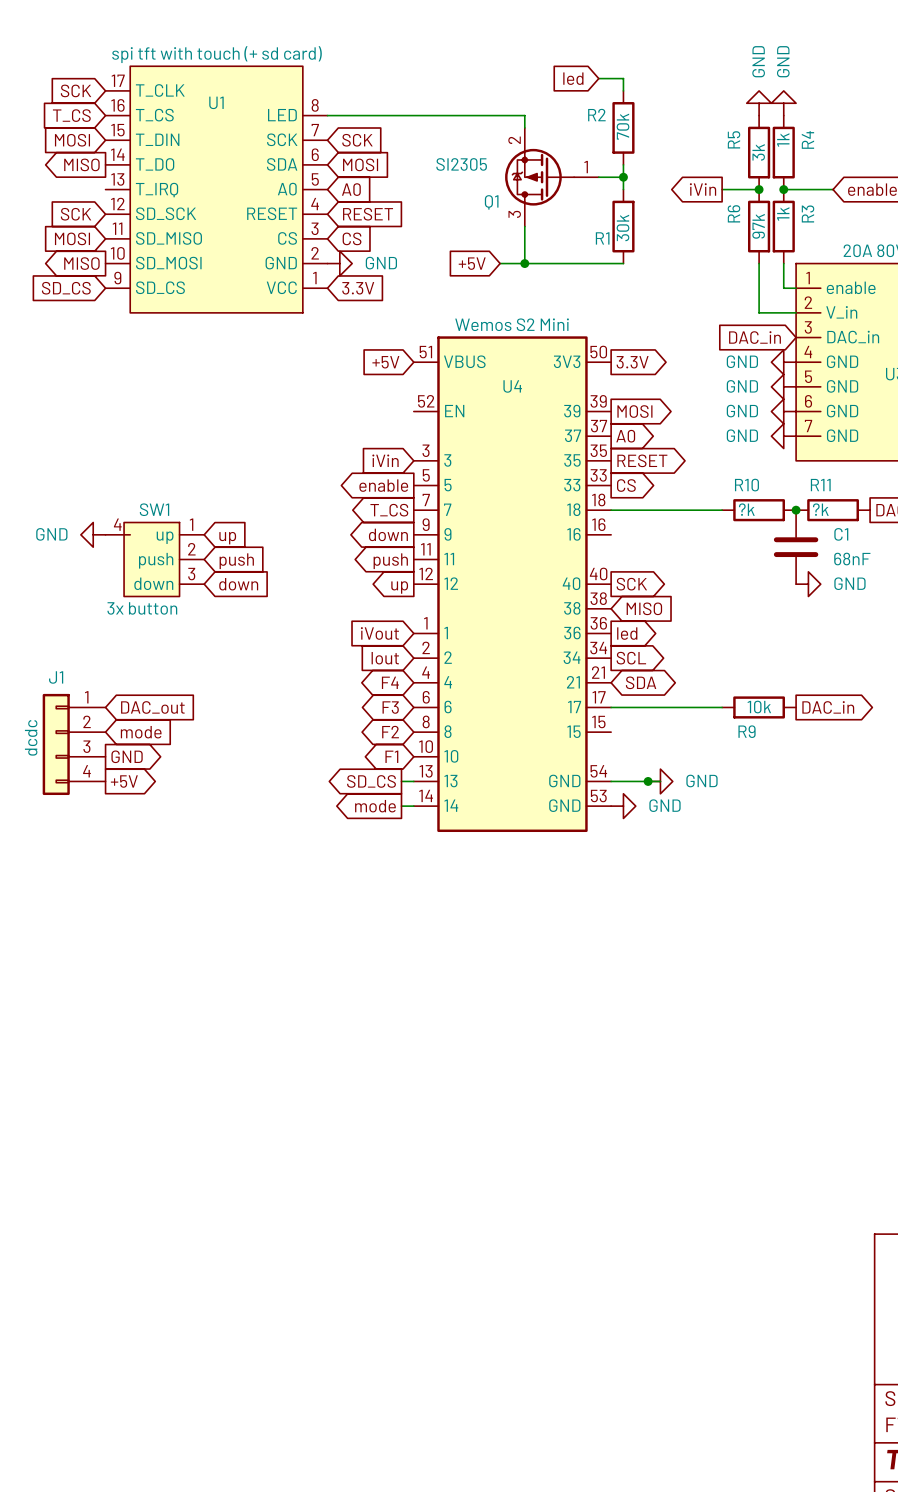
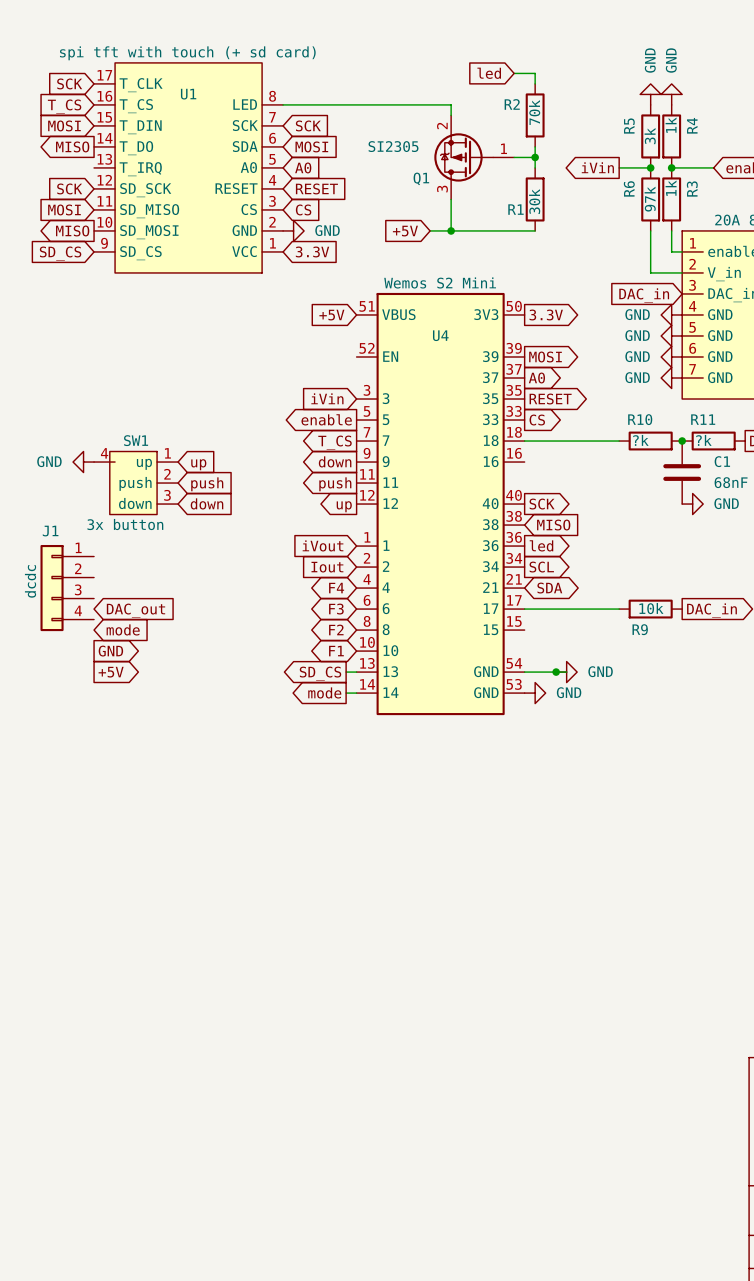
J1 position: (74, 744) -> (67, 588)

